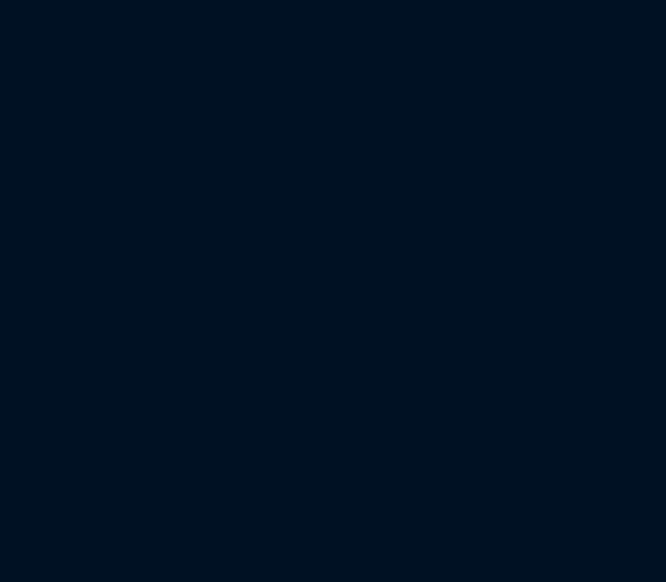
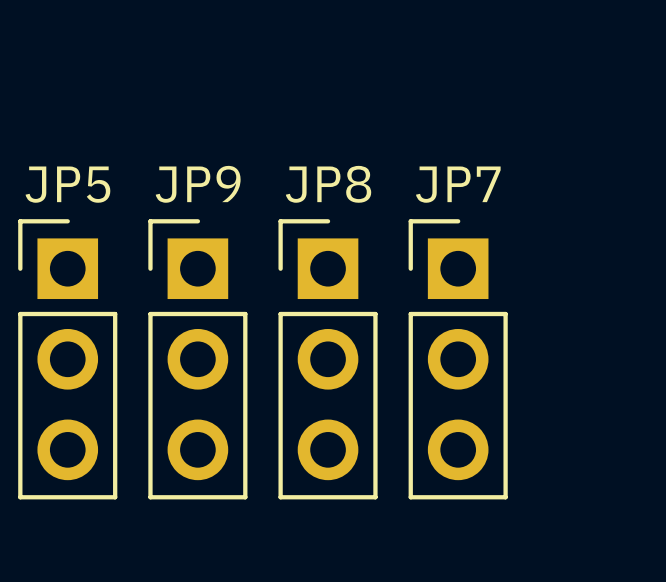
JP5: none -> (67, 359)
JP9: none -> (197, 359)
JP8: none -> (328, 359)
JP7: none -> (458, 359)

